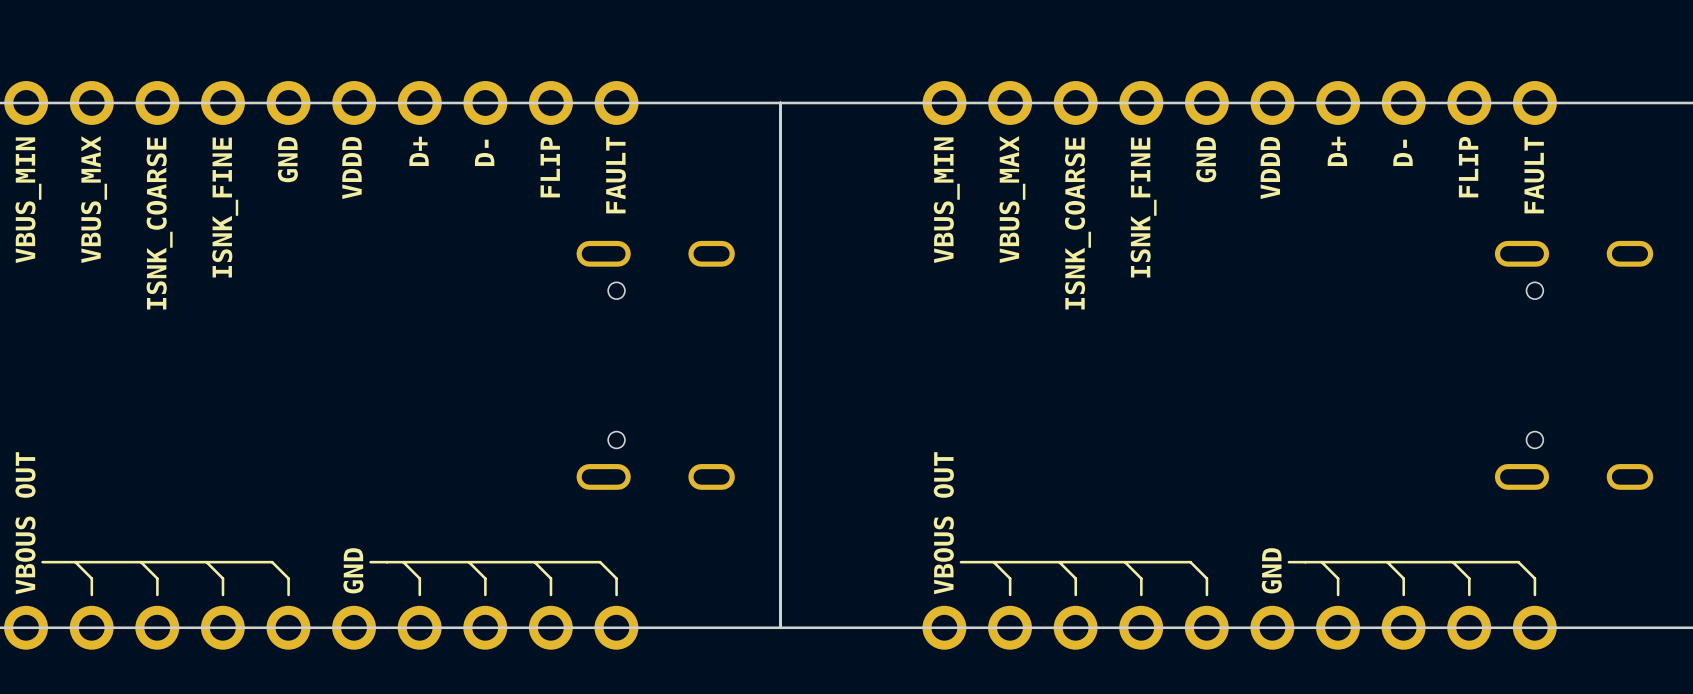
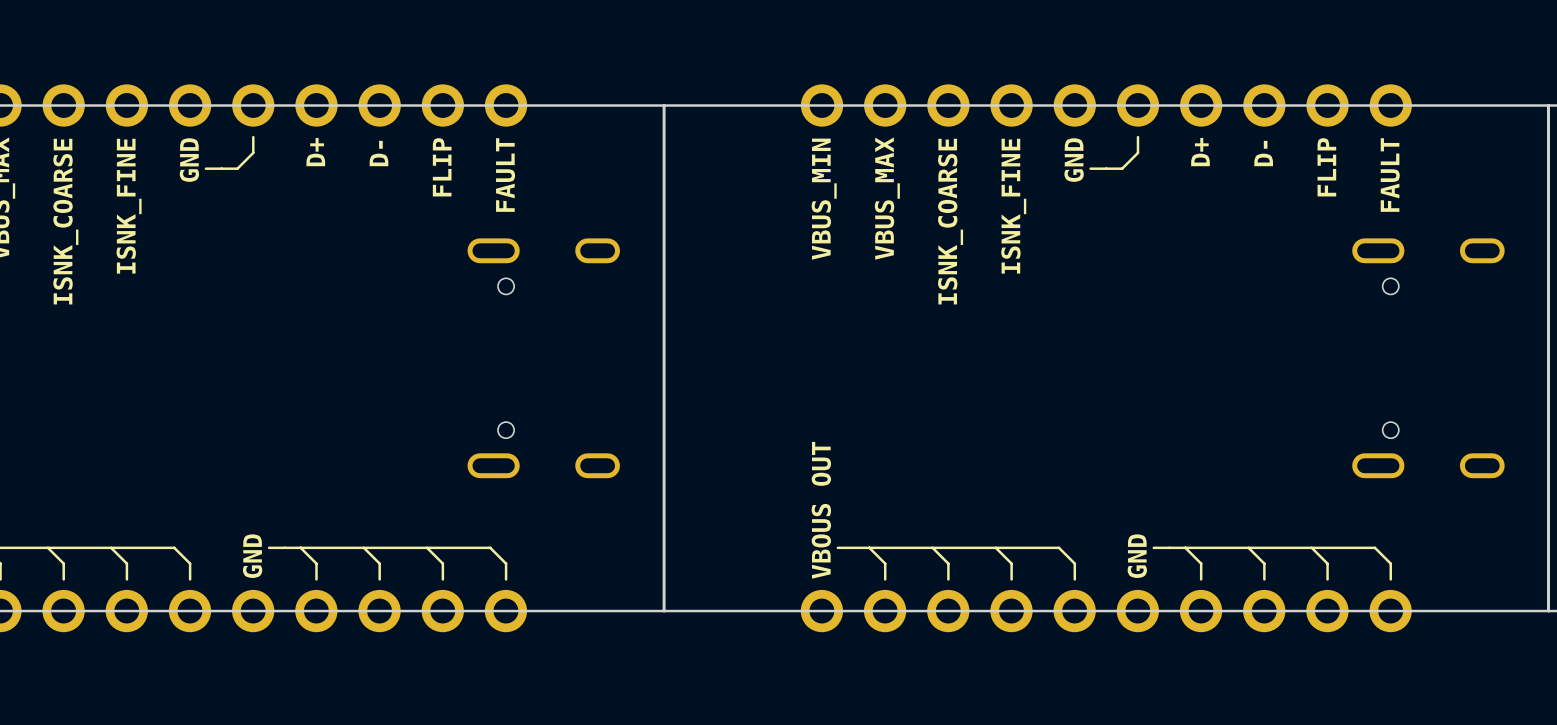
line: none -> (253, 137) (253, 152) (237, 168) (205, 168)
line: none -> (1137, 137) (1137, 152) (1122, 168) (1090, 168)
text: VDDD (352, 168) -> none
text: VDDD (1270, 168) -> none

